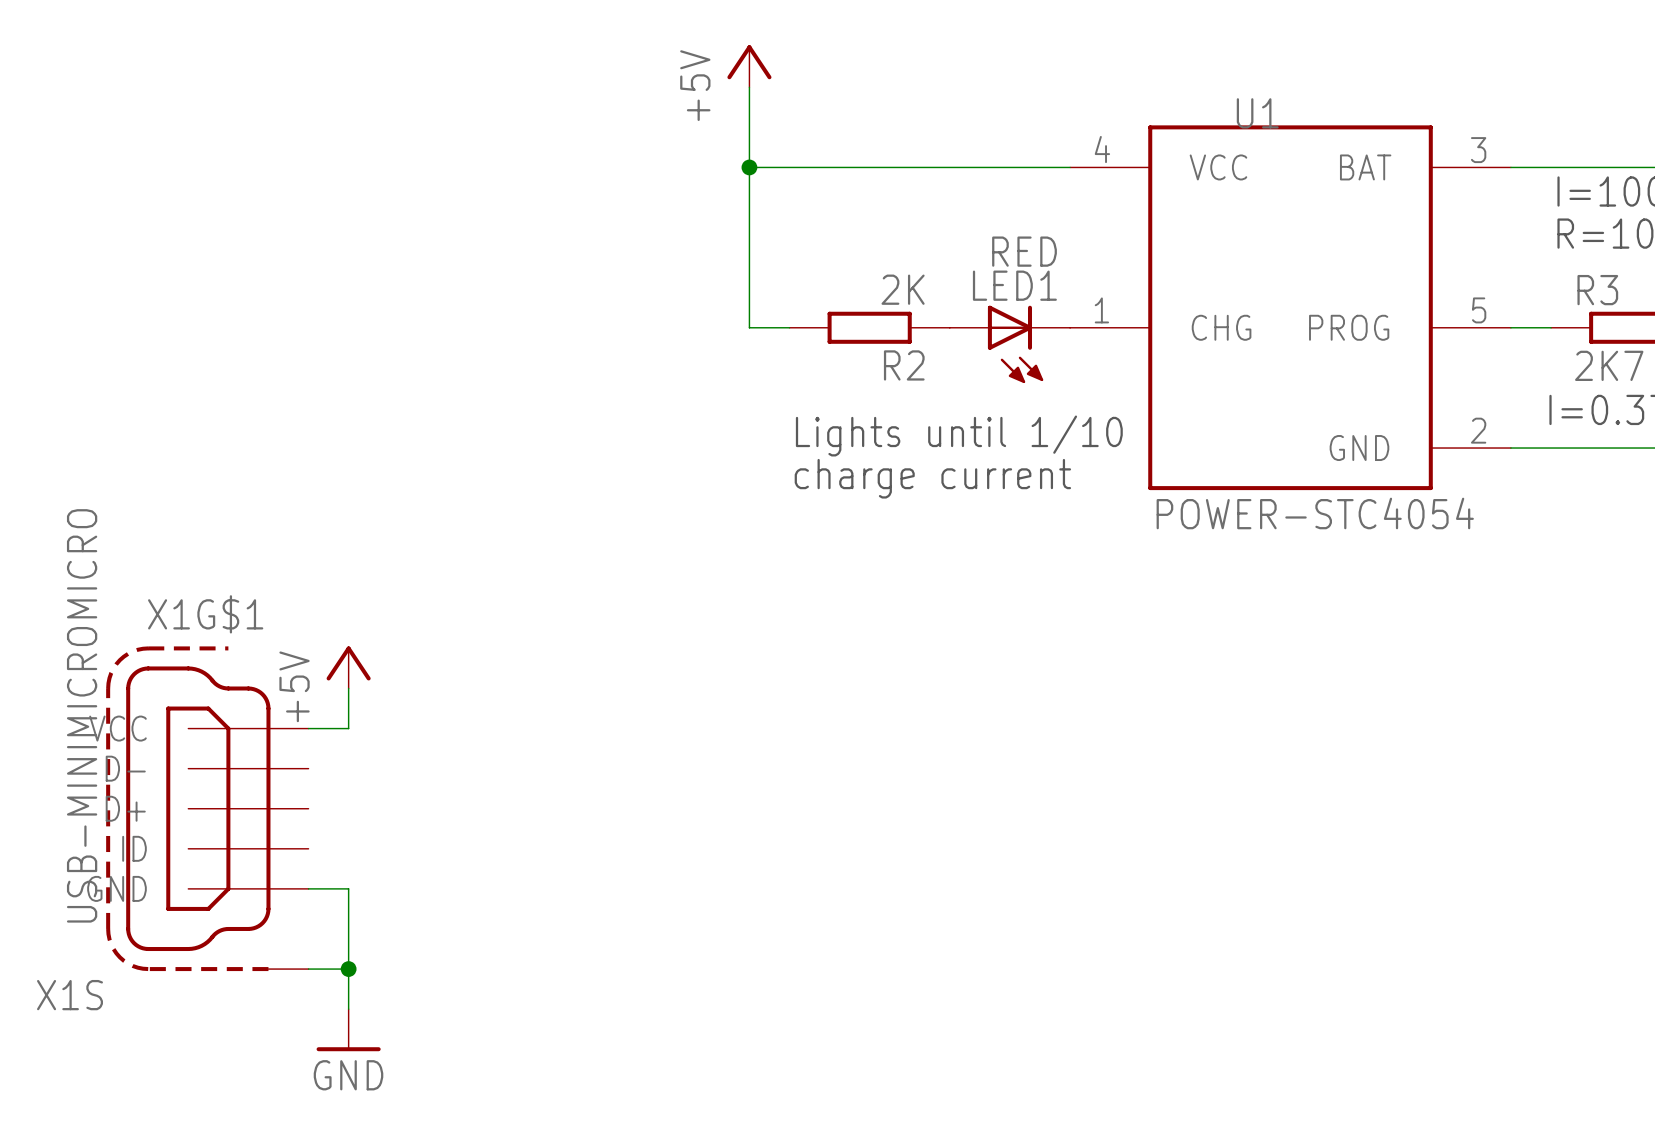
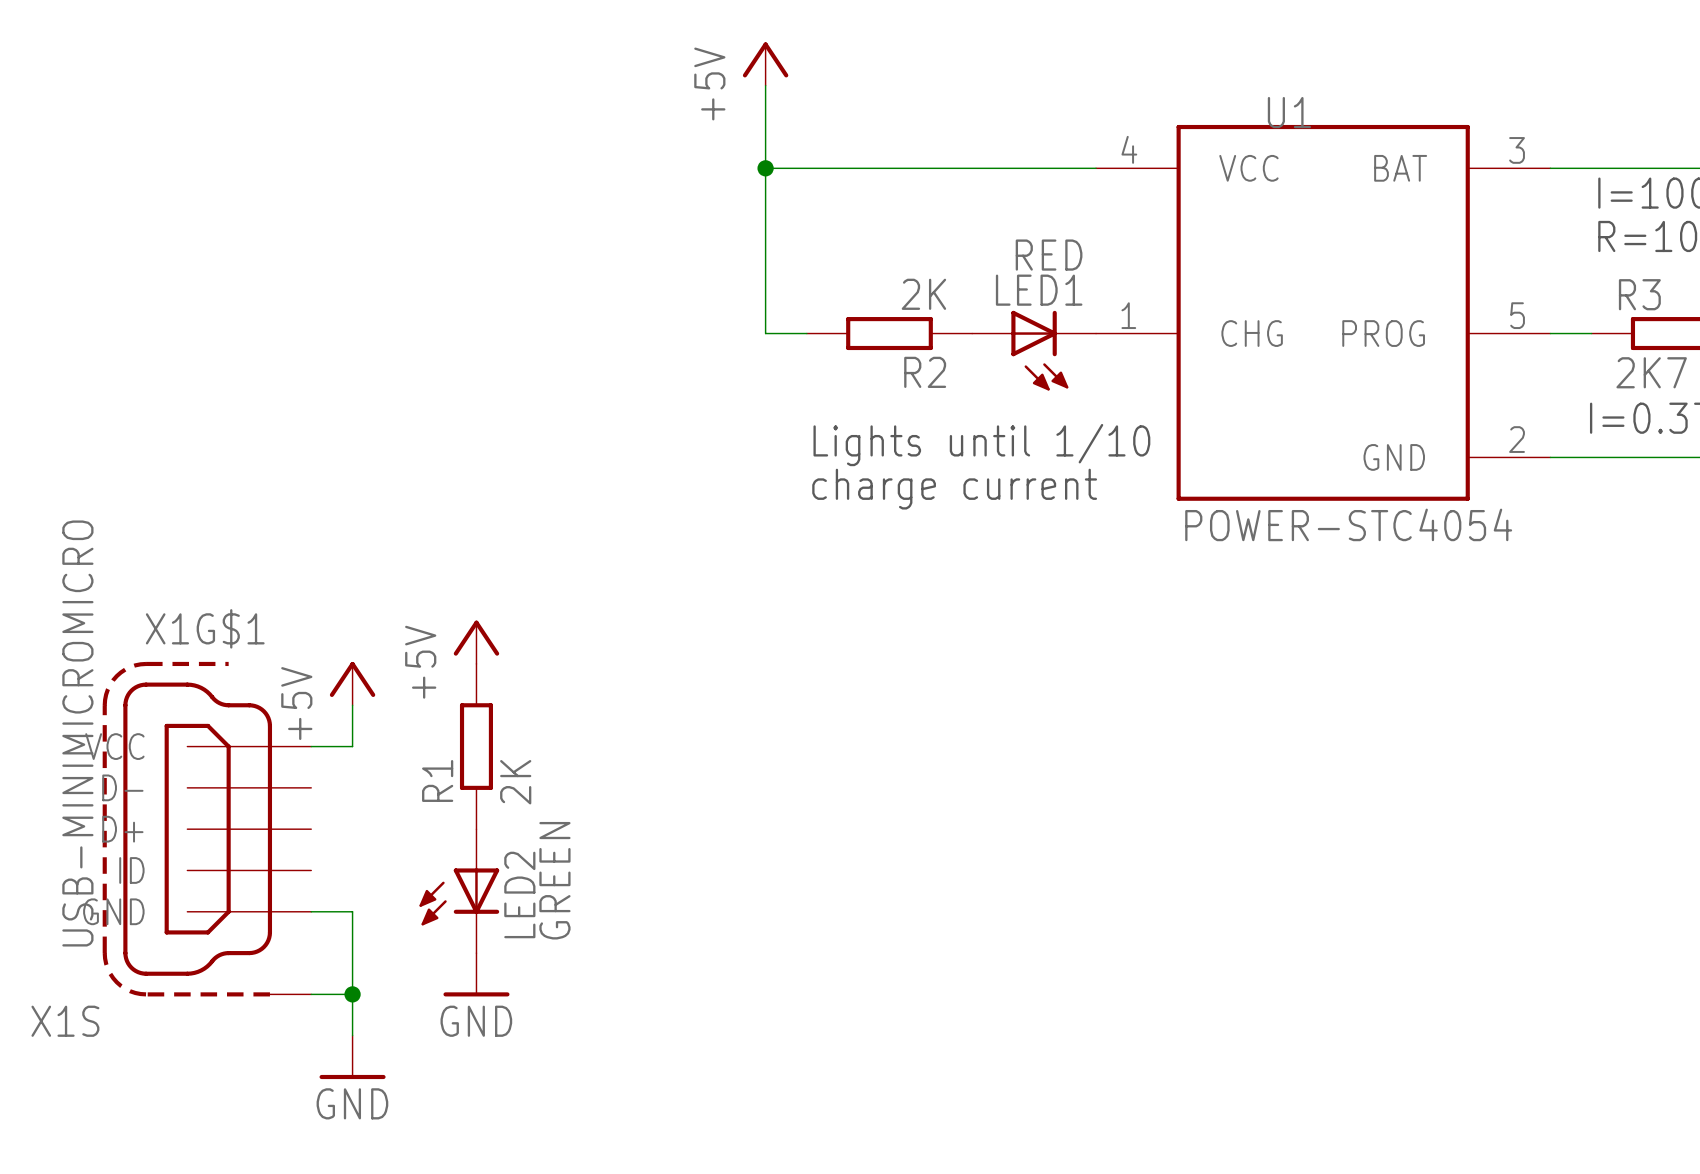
power symbol: none -> +5V (476, 642)
R1: none -> 2K (476, 746)
LED2: none -> GREEN (459, 891)
power symbol: none -> GND (476, 974)

